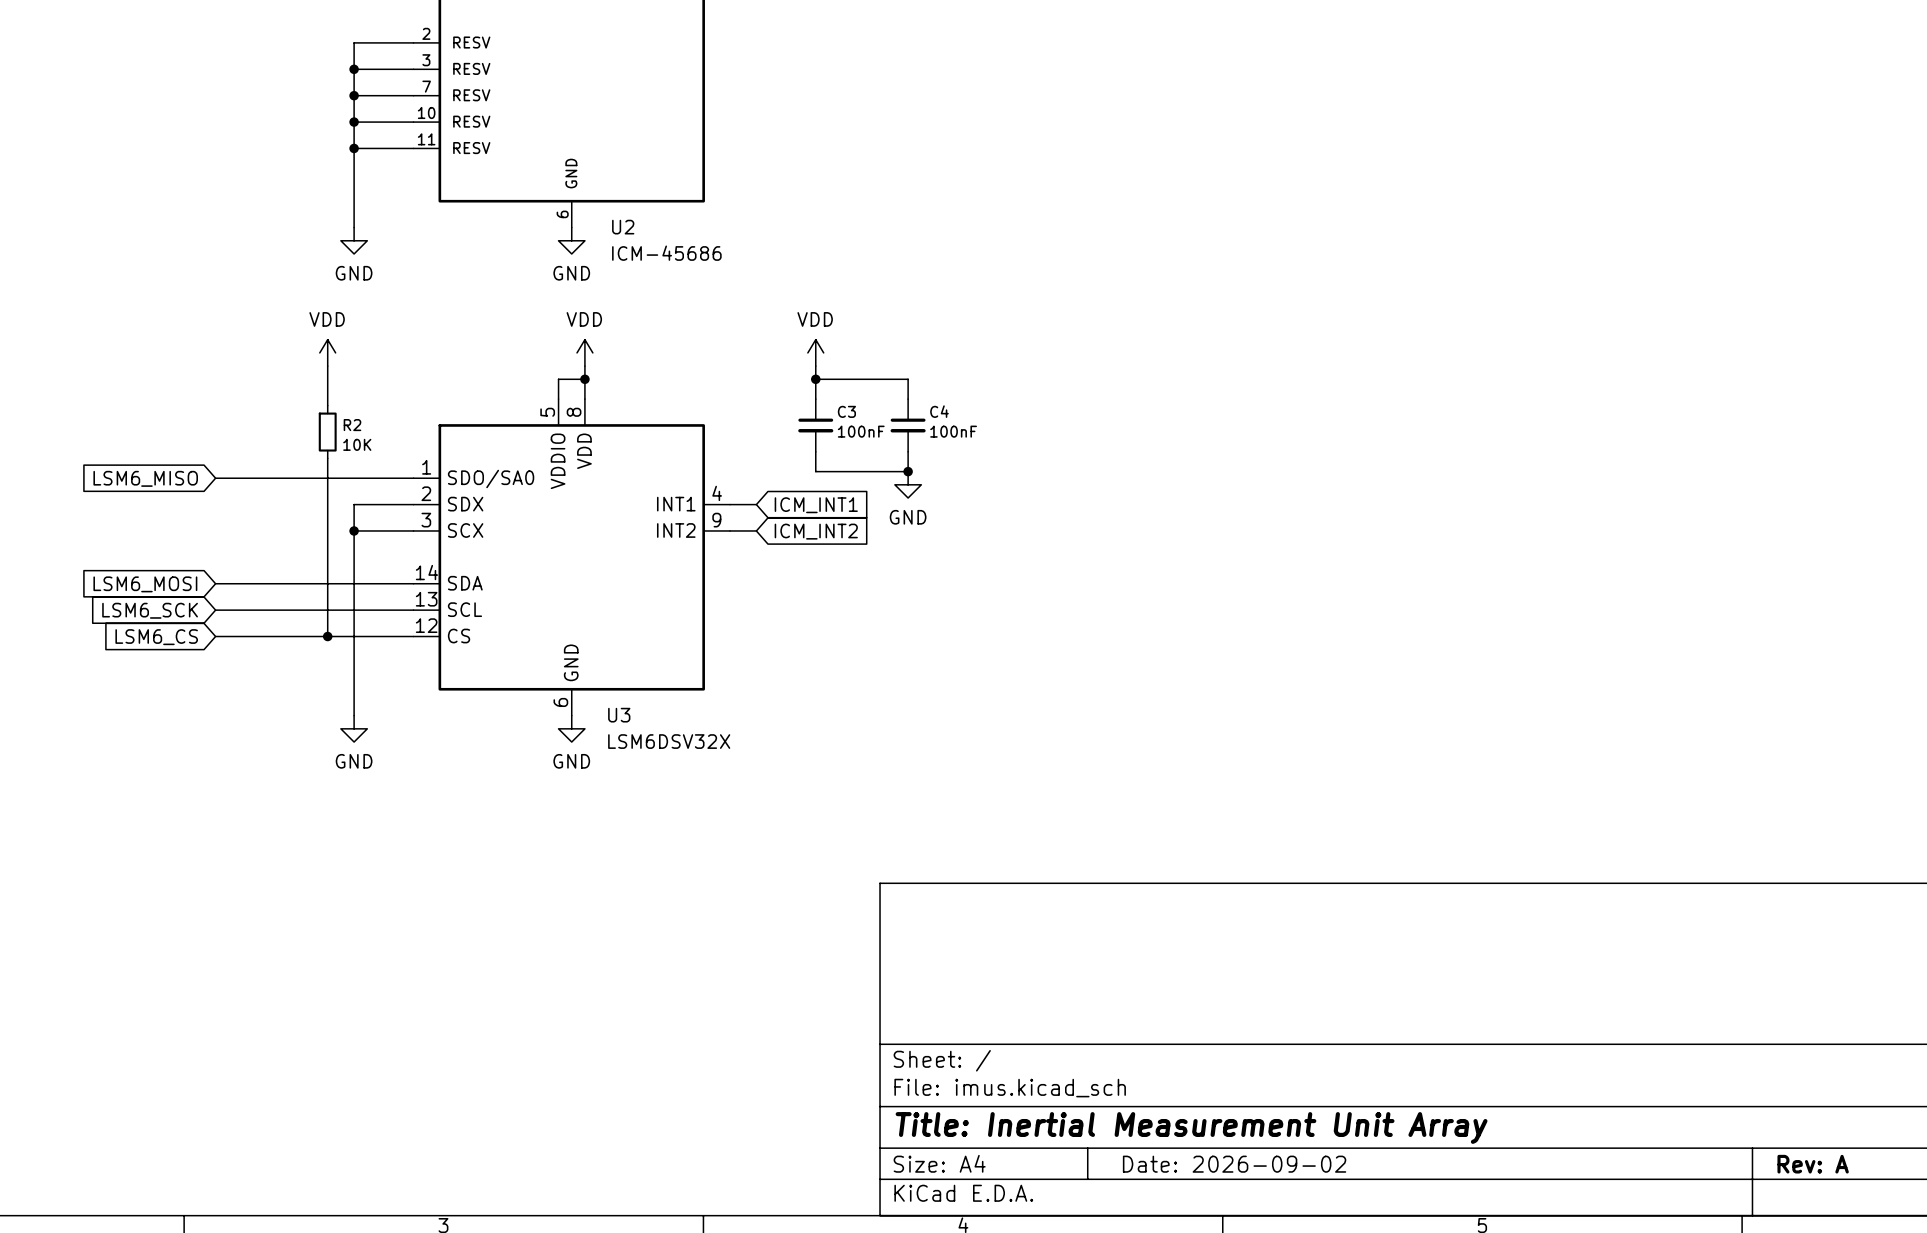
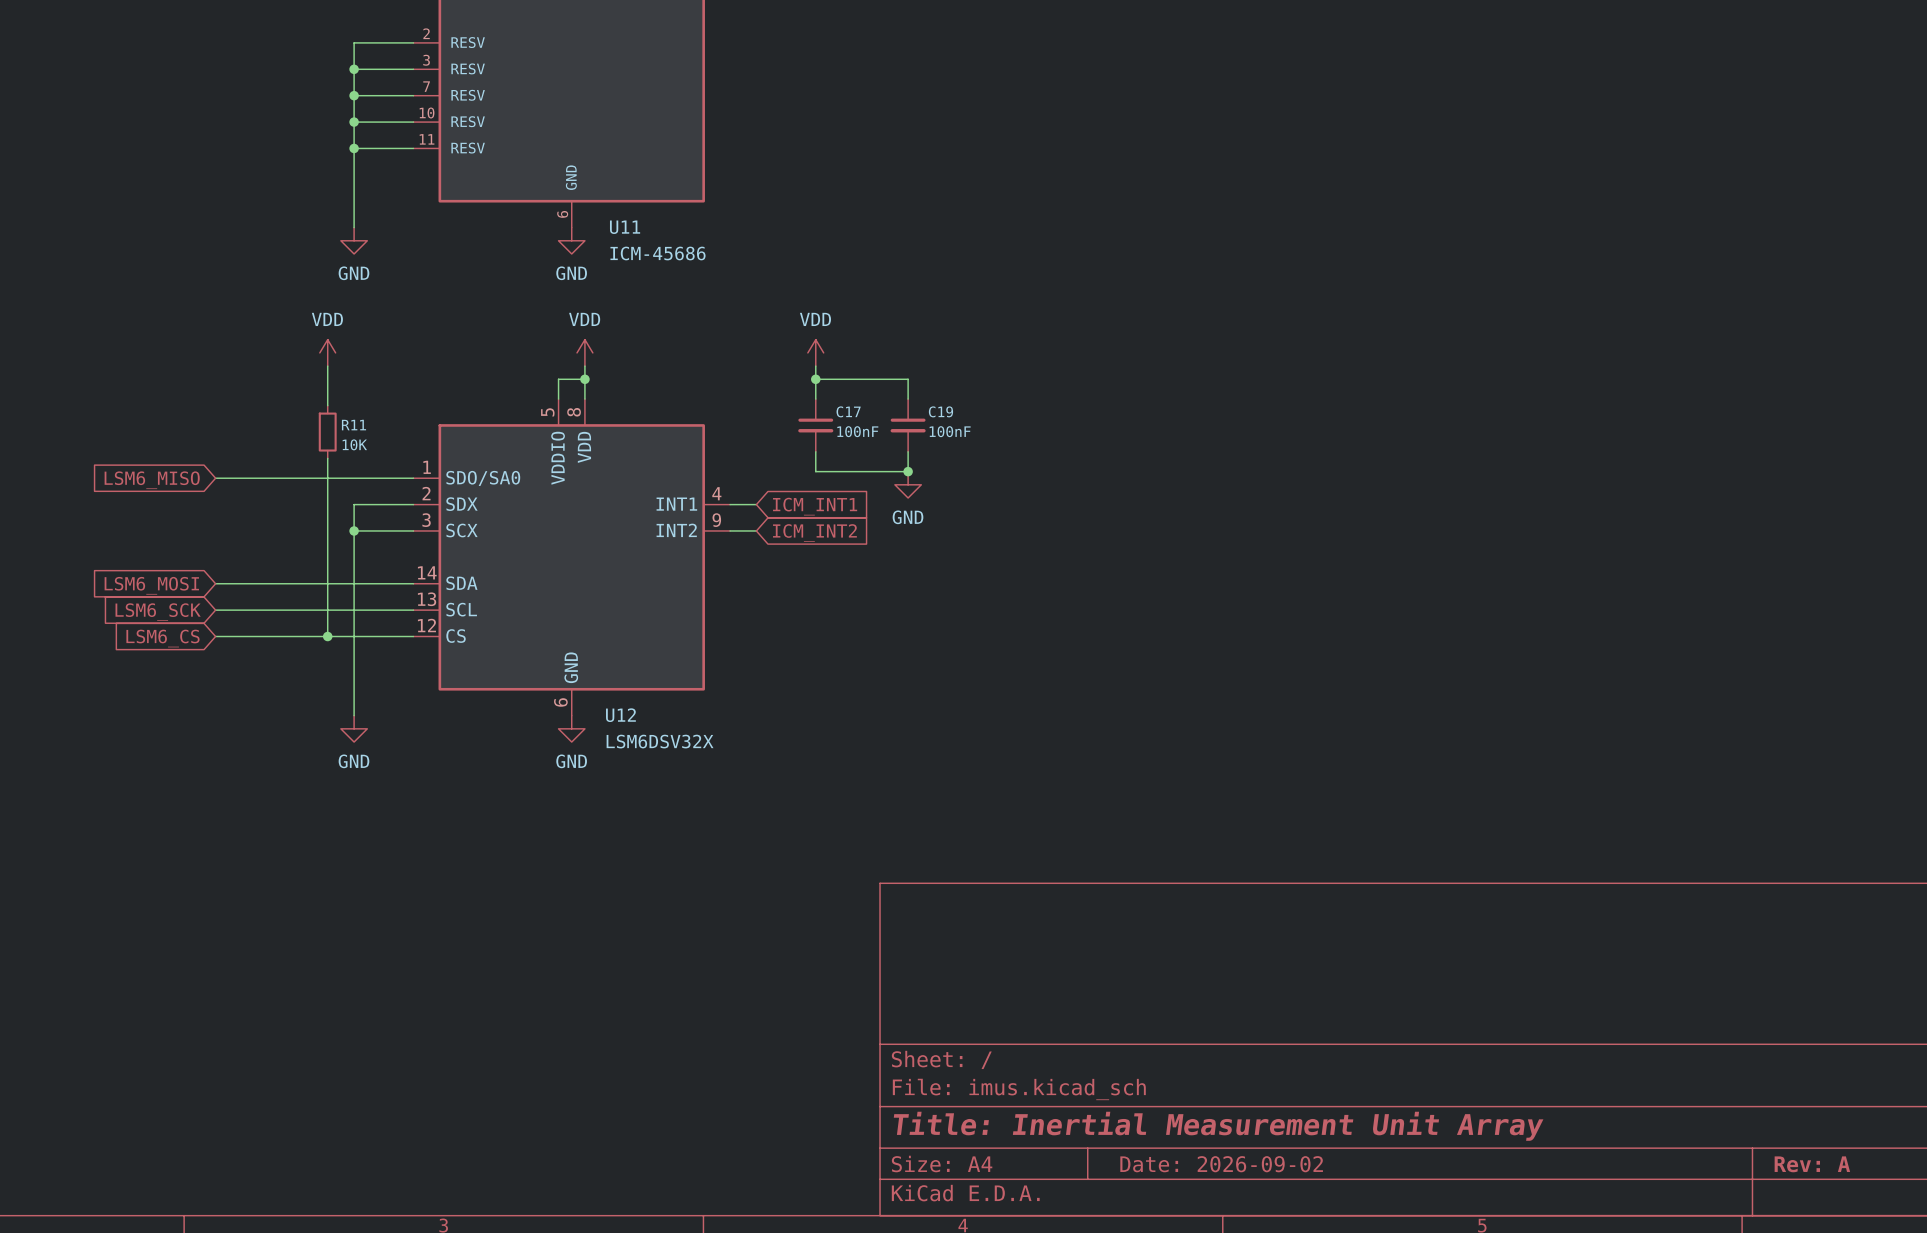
U2 name: U2 (623, 227) -> U11 (625, 227)
C3 name: C3 (846, 411) -> C17 (848, 411)
C4 name: C4 (939, 411) -> C19 (940, 411)
R2 name: R2 (352, 425) -> R11 (353, 425)
U3 name: U3 (619, 715) -> U12 (620, 715)

